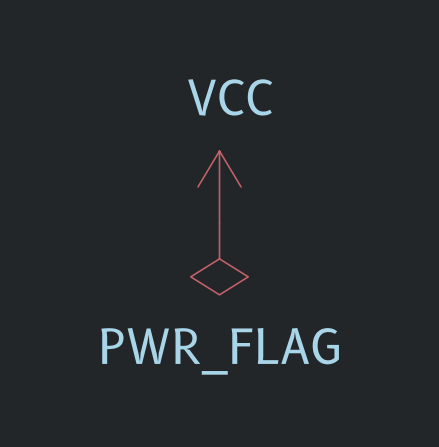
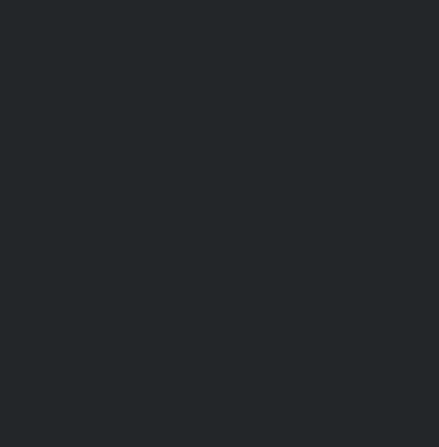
power symbol: VCC (219, 186) -> none
power symbol: PWR_FLAG (219, 258) -> none

